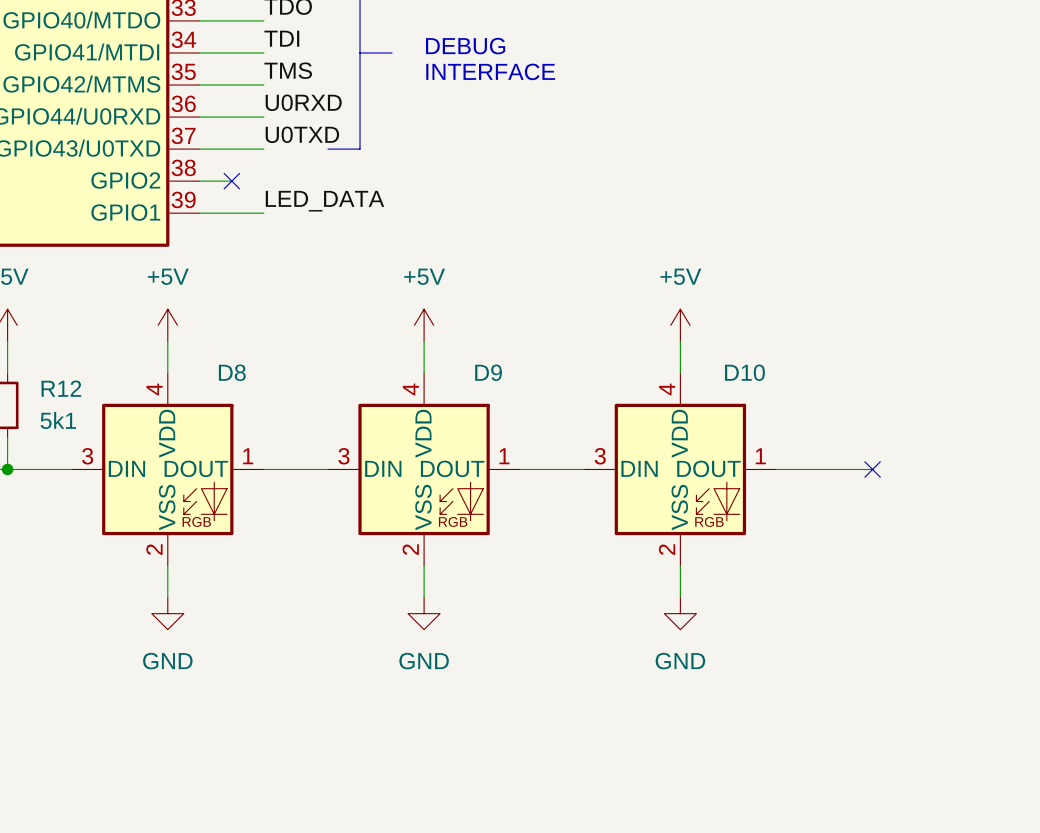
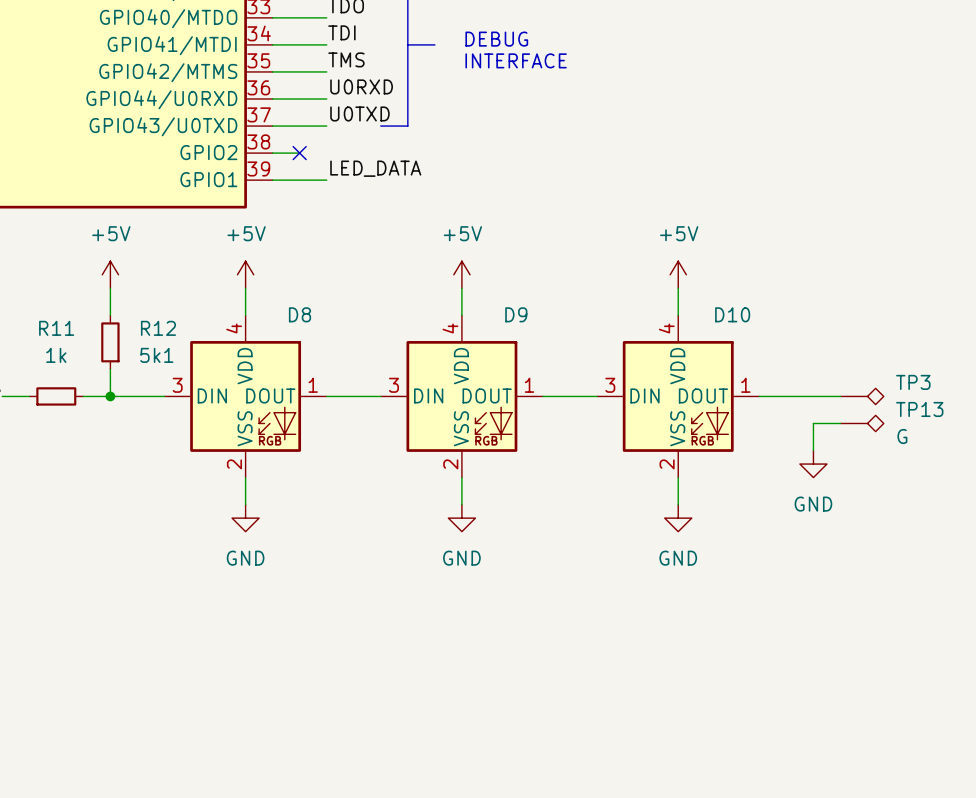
no-connect mark: (872, 469) -> none
TP3: none -> (862, 396)
wire: none -> (840, 423) (813, 423) (813, 450)
TP13: none -> G (862, 423)
power symbol: none -> GND (813, 464)

